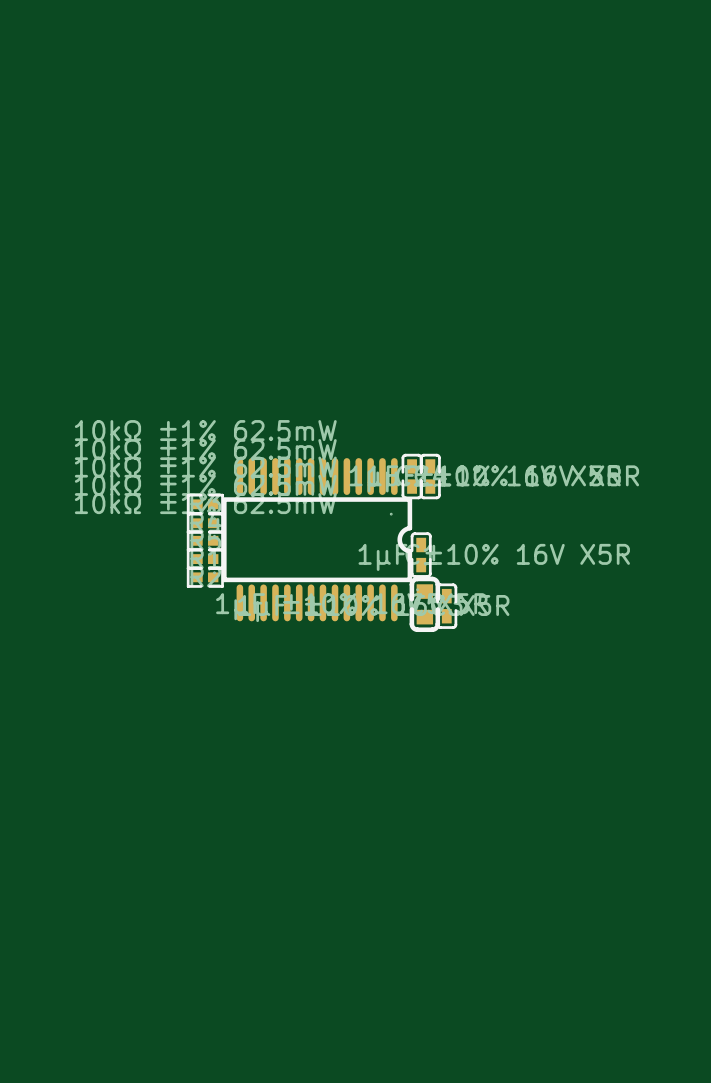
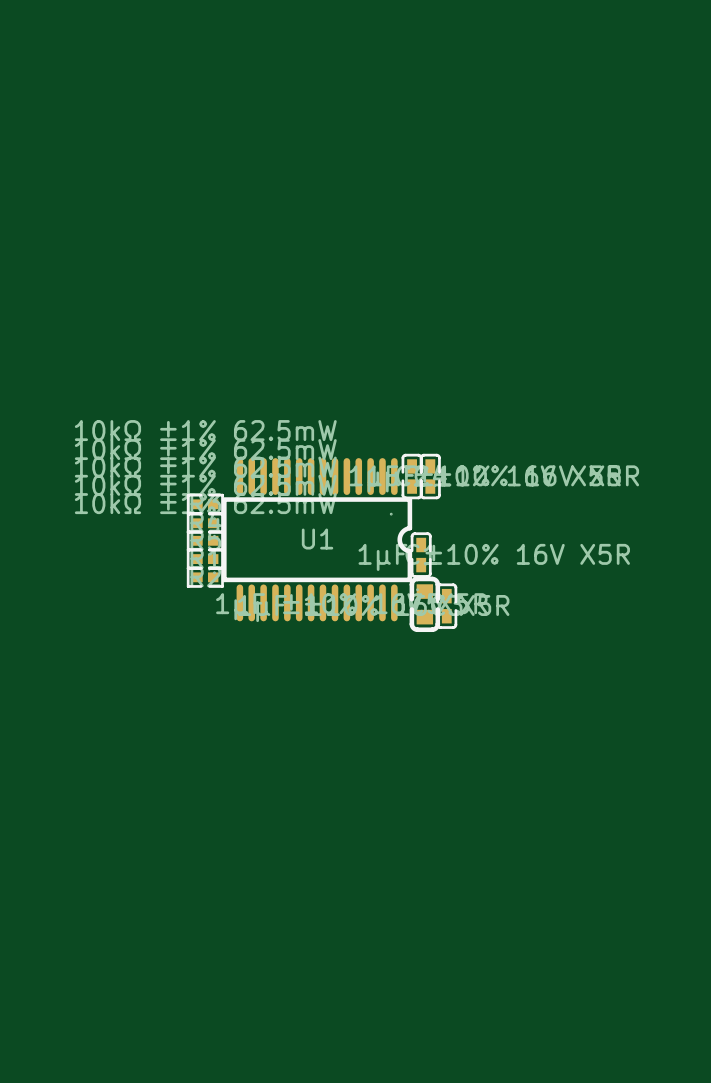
U1 name: none -> U1 (317, 539)

